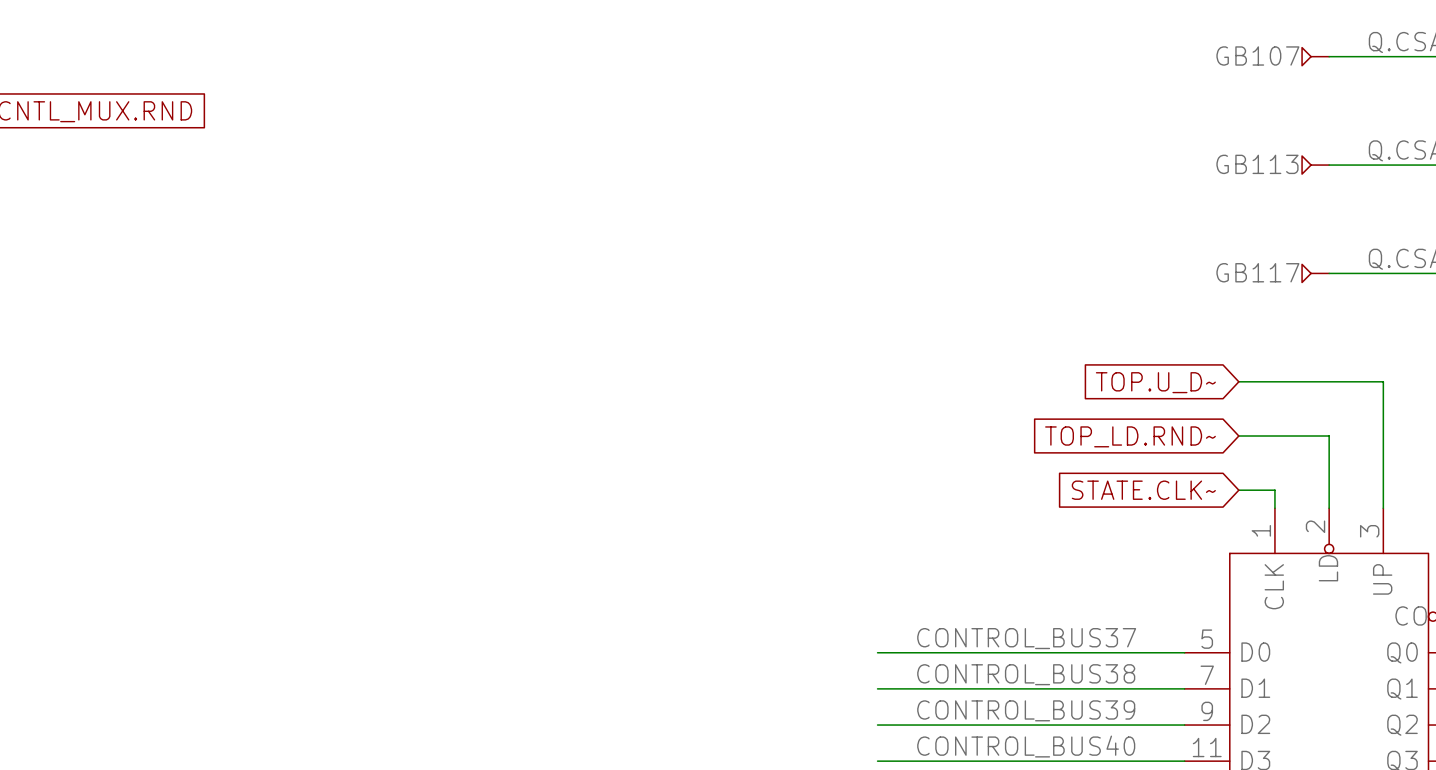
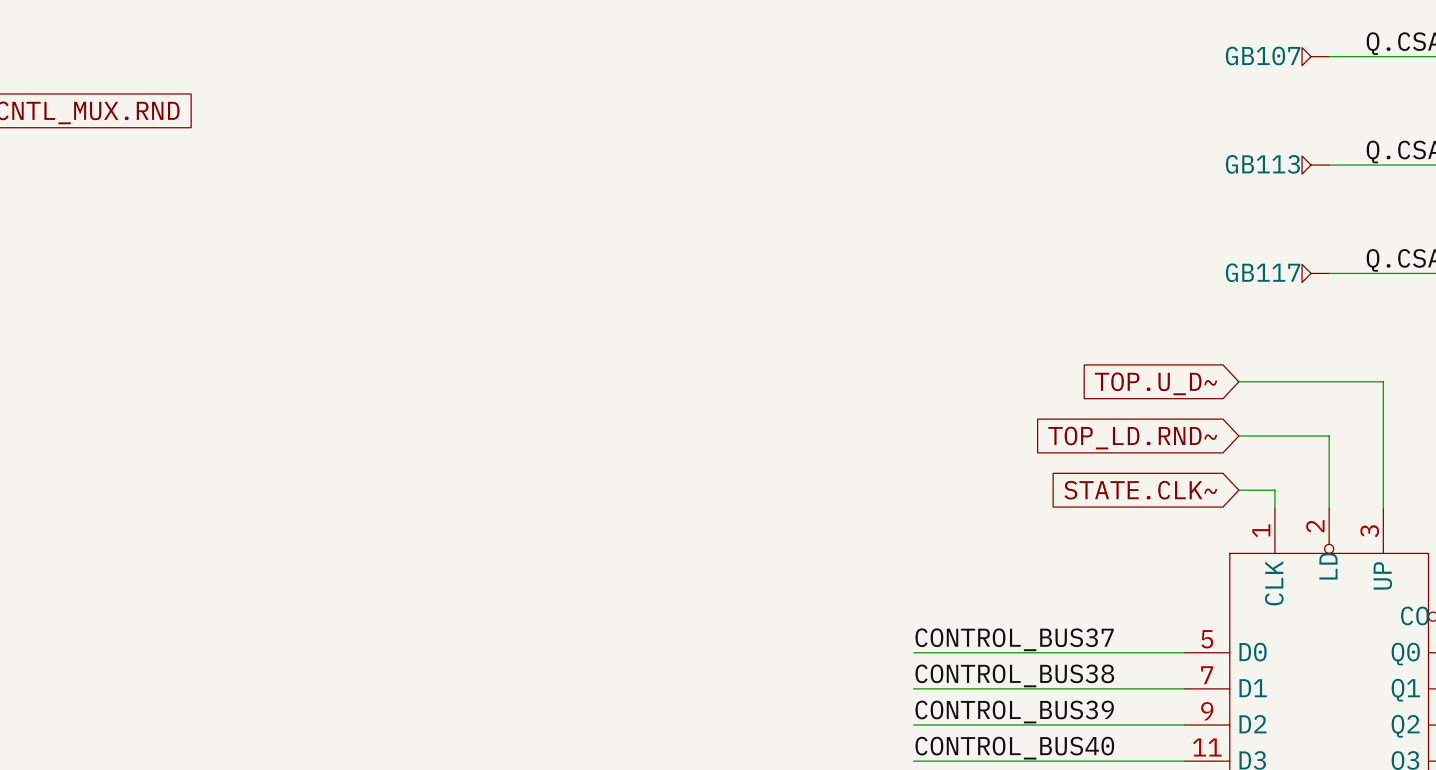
wire: (877, 652) (913, 652) -> none
wire: (877, 688) (913, 688) -> none
wire: (877, 725) (913, 725) -> none
wire: (877, 761) (913, 761) -> none

